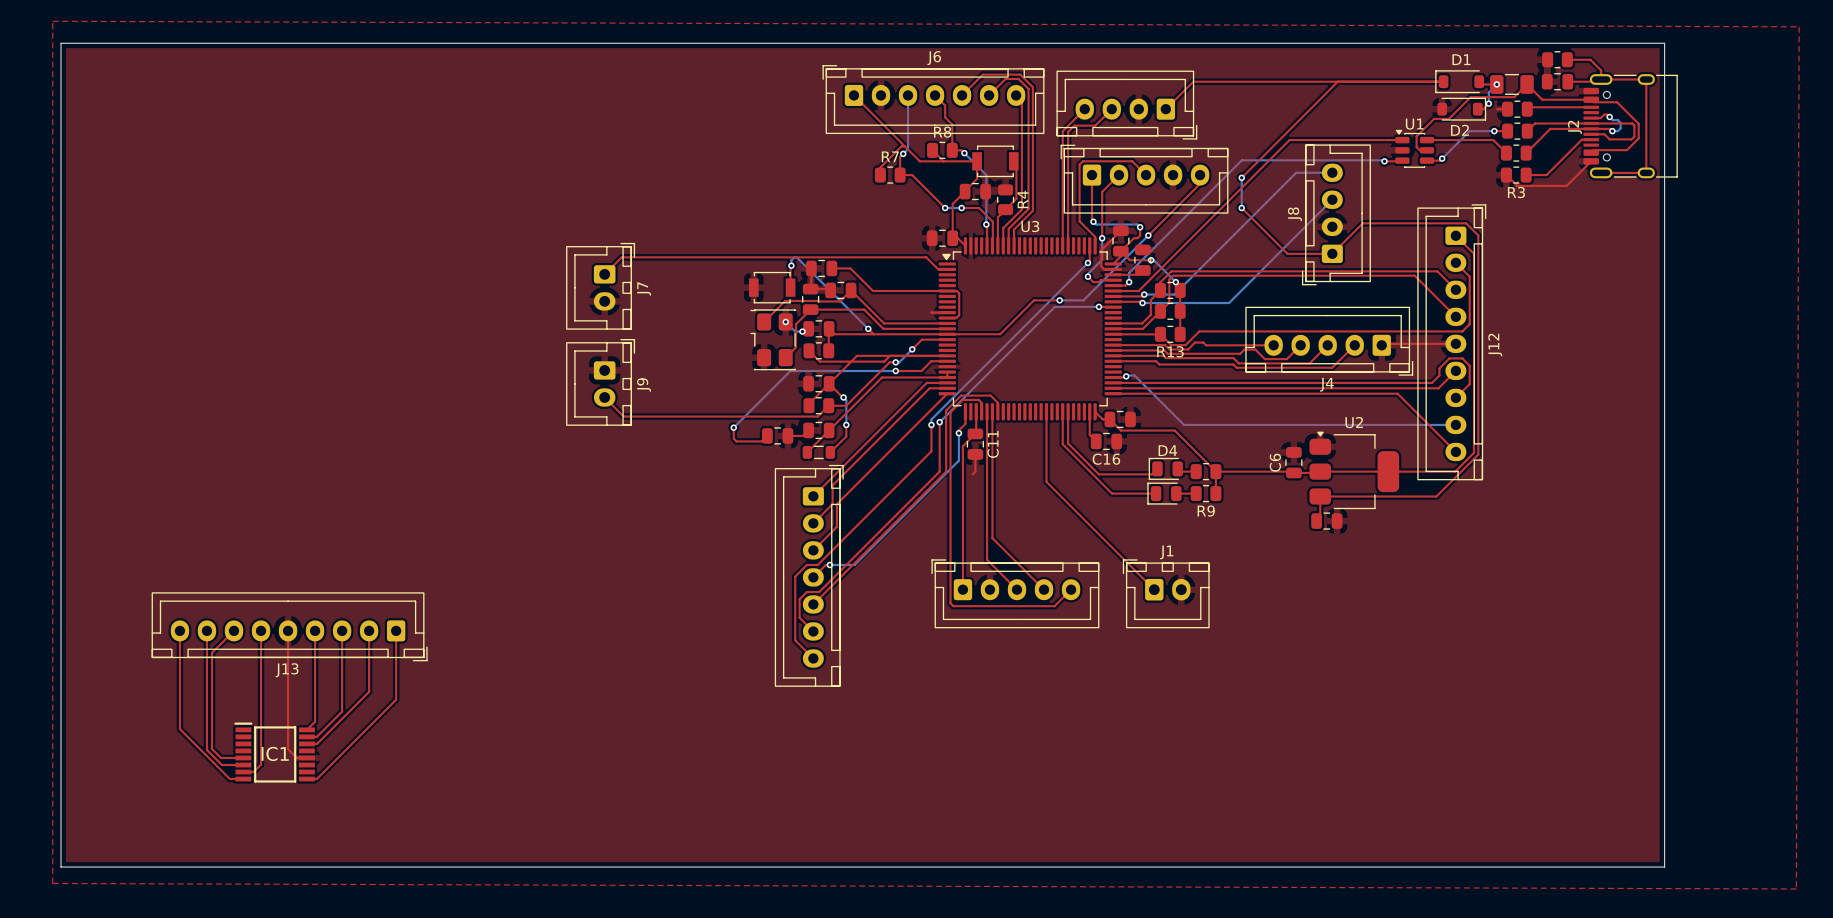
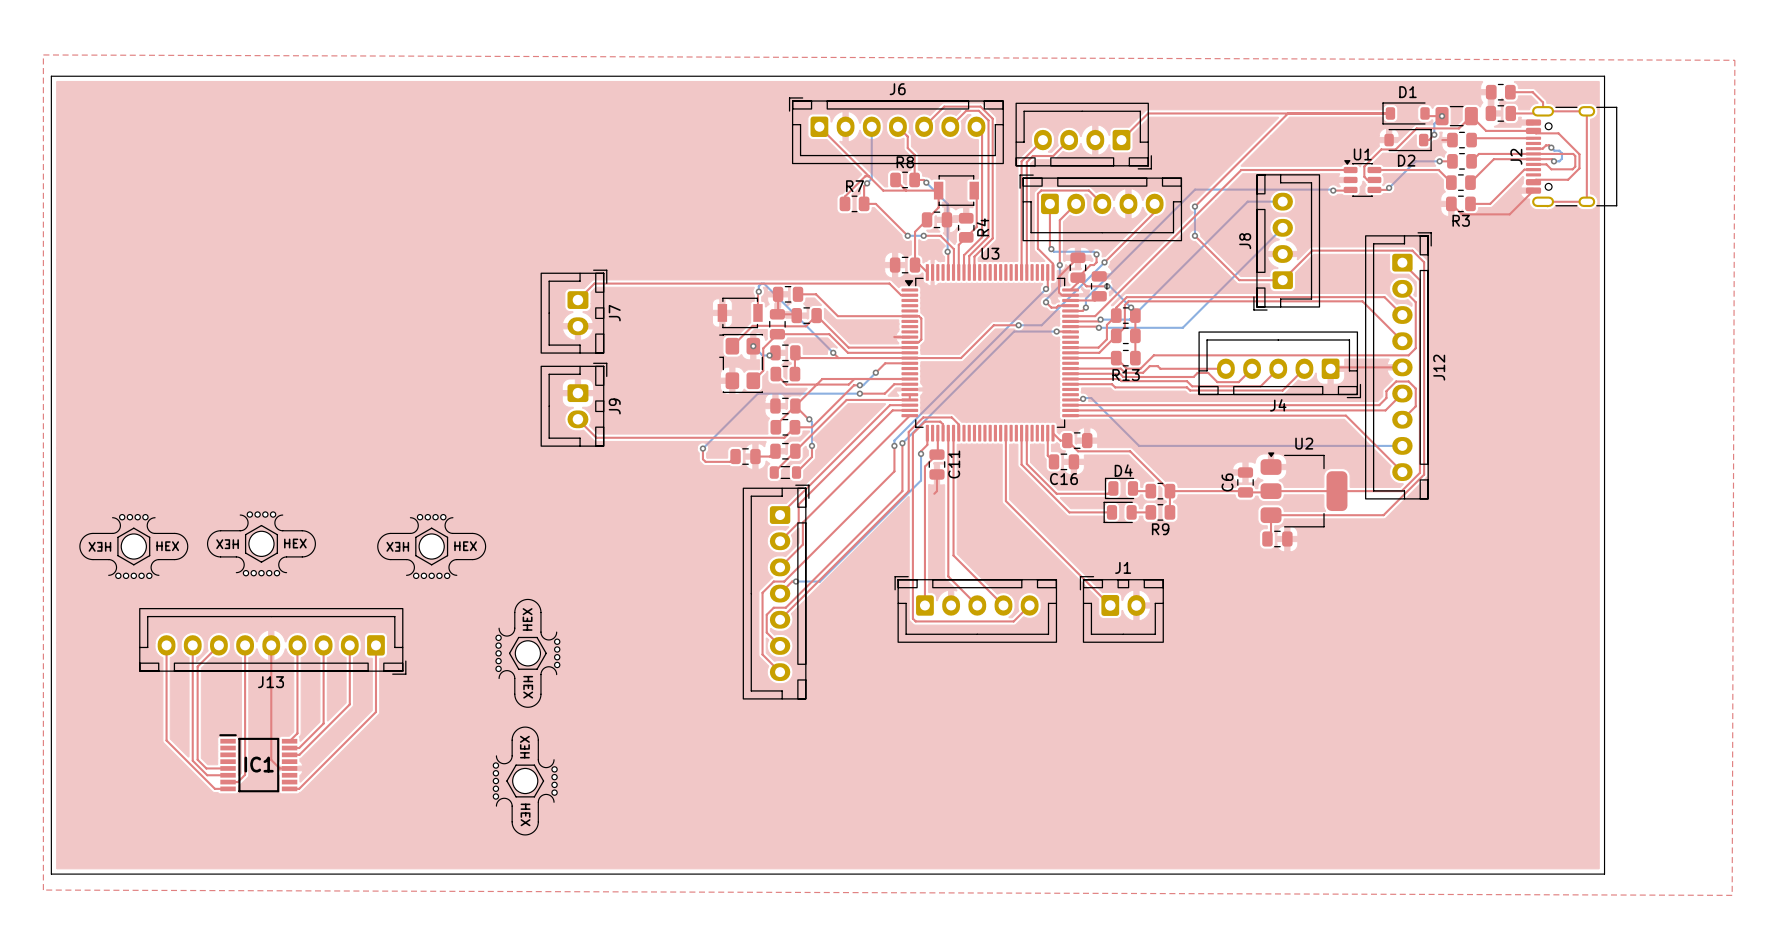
part: none -> (261, 543)
part: none -> (133, 546)
part: none -> (431, 546)
part: none -> (527, 653)
part: none -> (525, 781)

